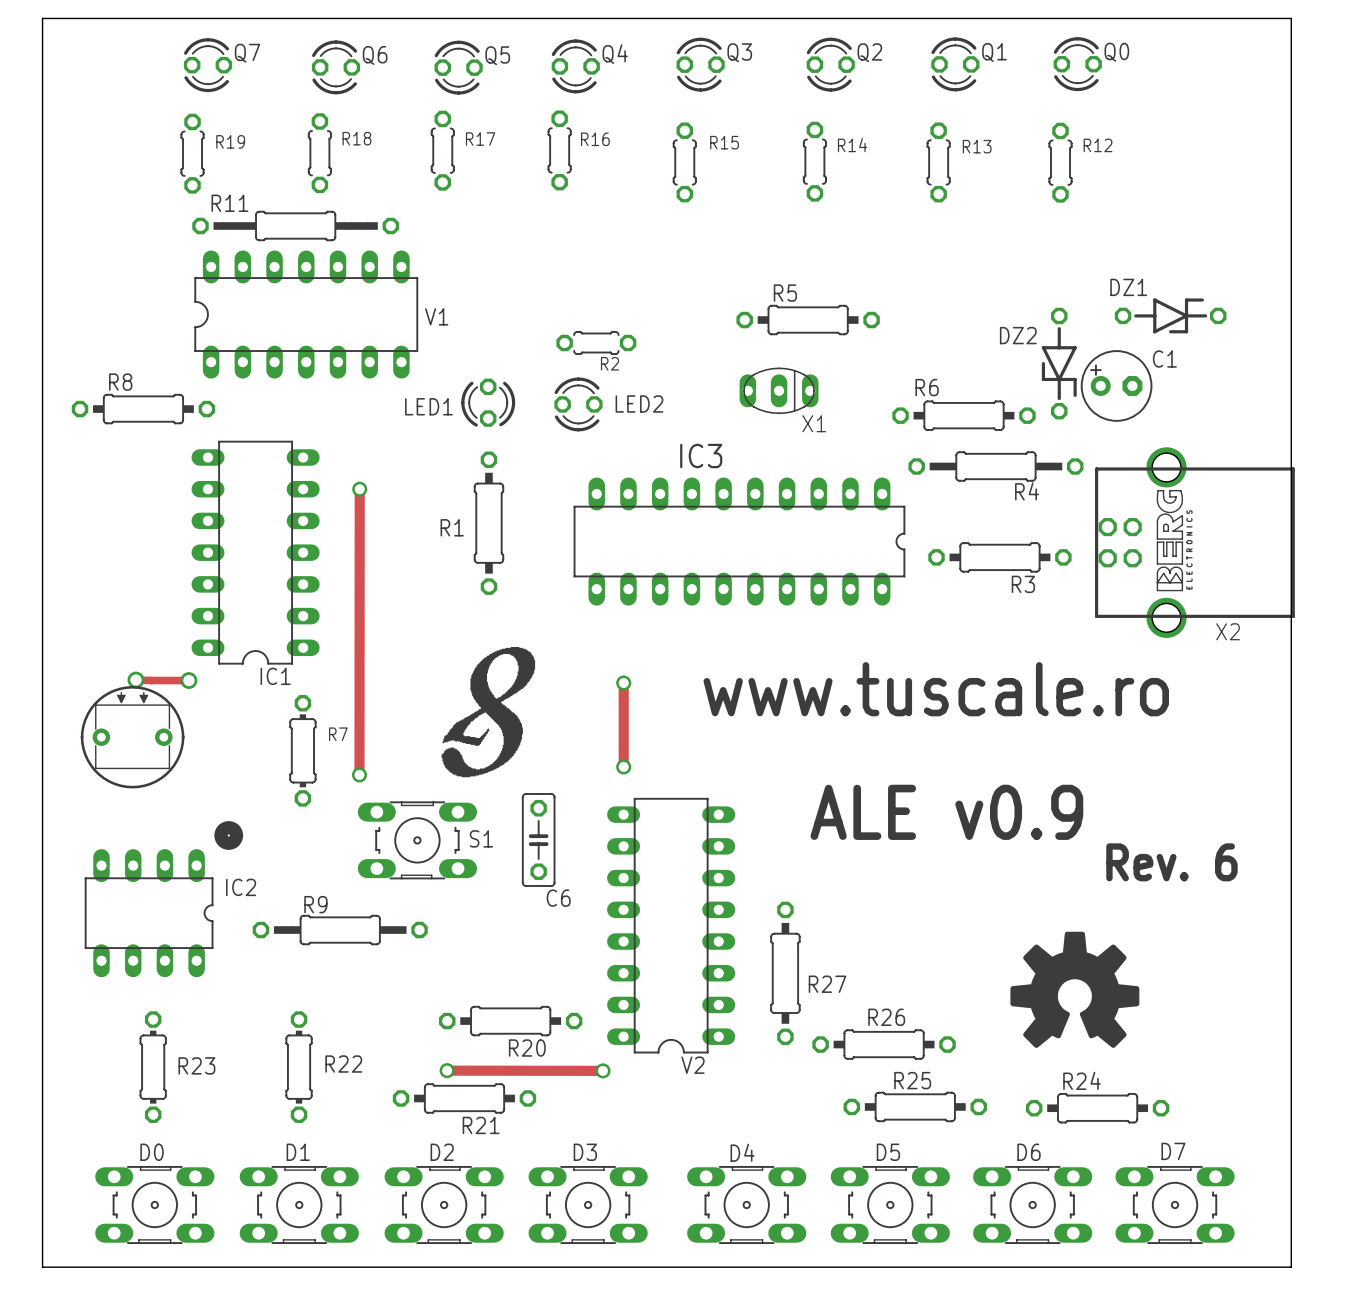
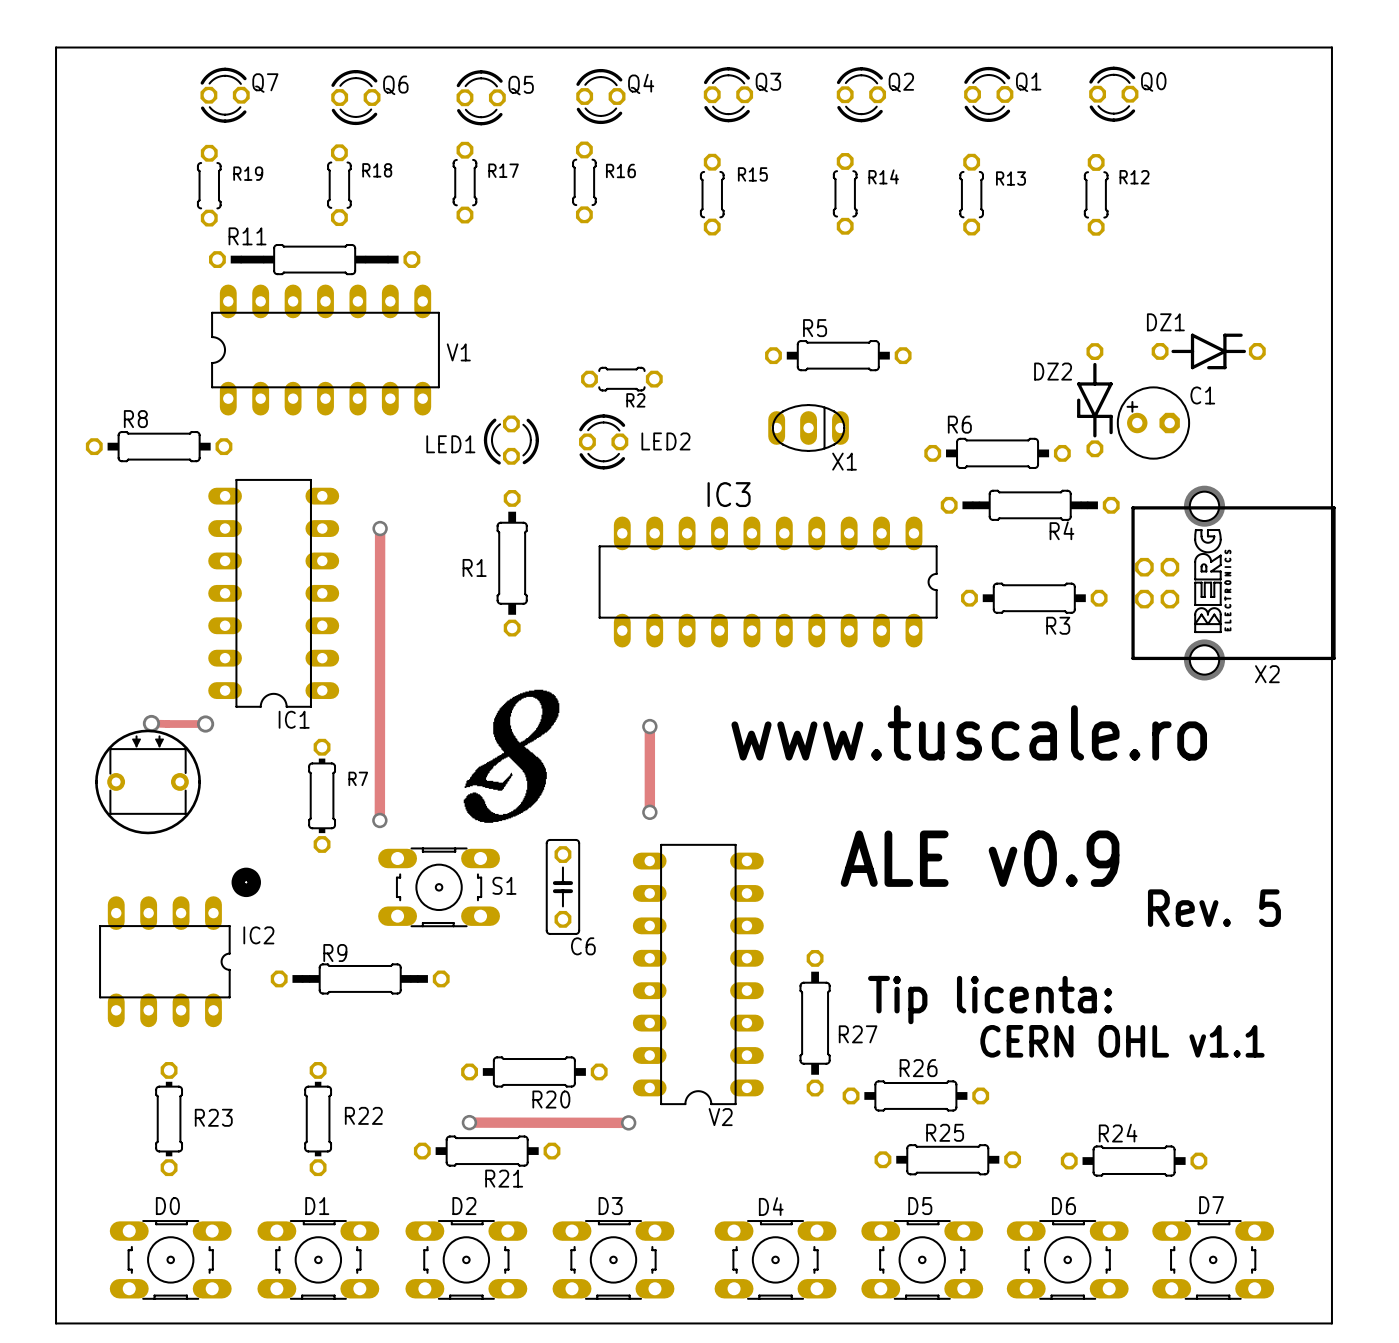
text: Rev. 6 (1171, 862) -> Rev. 5 (1214, 908)
drawing: [1010, 931, 1140, 1048] -> none
text: none -> Tip licenta: (990, 1000)
text: none -> CERN OHL v1.1 (1122, 1041)

